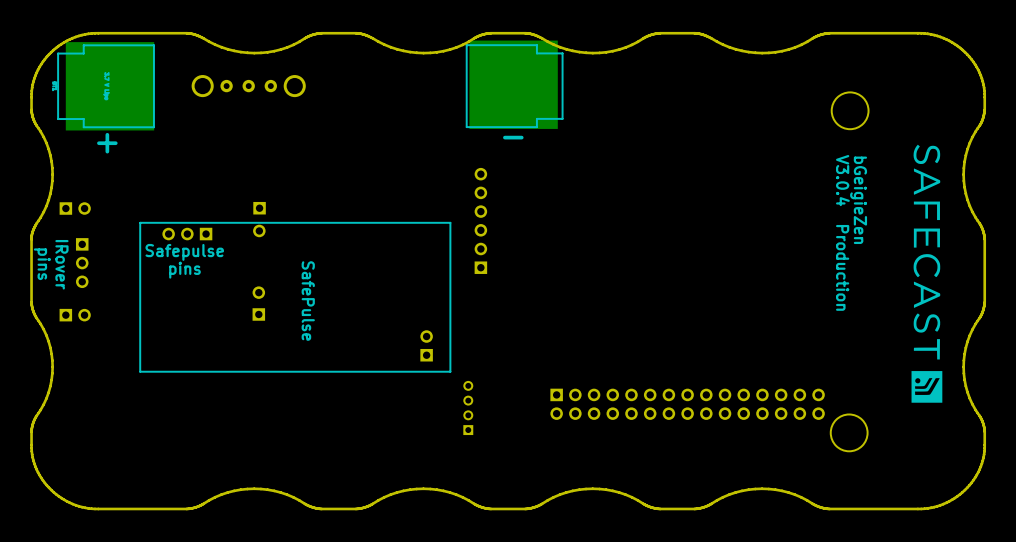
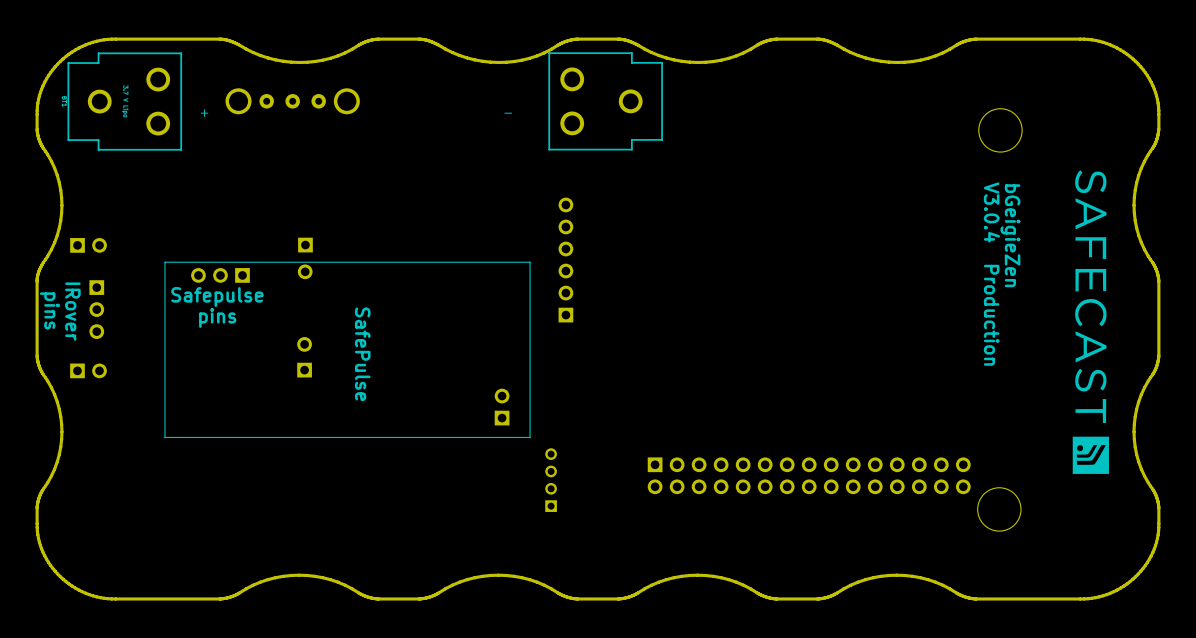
part footprint: [57, 40, 564, 131] -> [67, 52, 663, 151]

